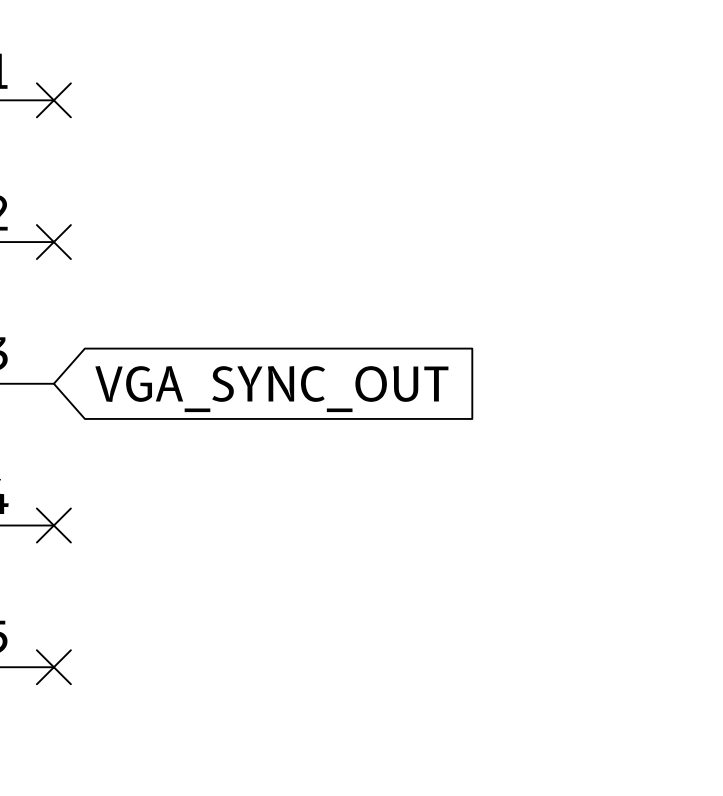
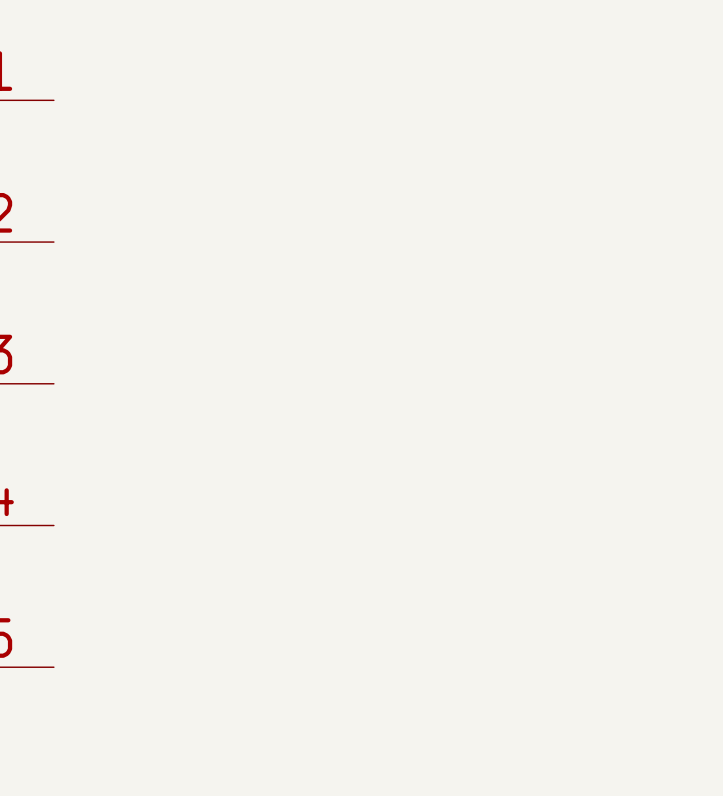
no-connect mark: (53, 100) -> none
no-connect mark: (53, 242) -> none
global label: VGA_SYNC_OUT (271, 389) -> none
no-connect mark: (53, 525) -> none
no-connect mark: (53, 667) -> none

